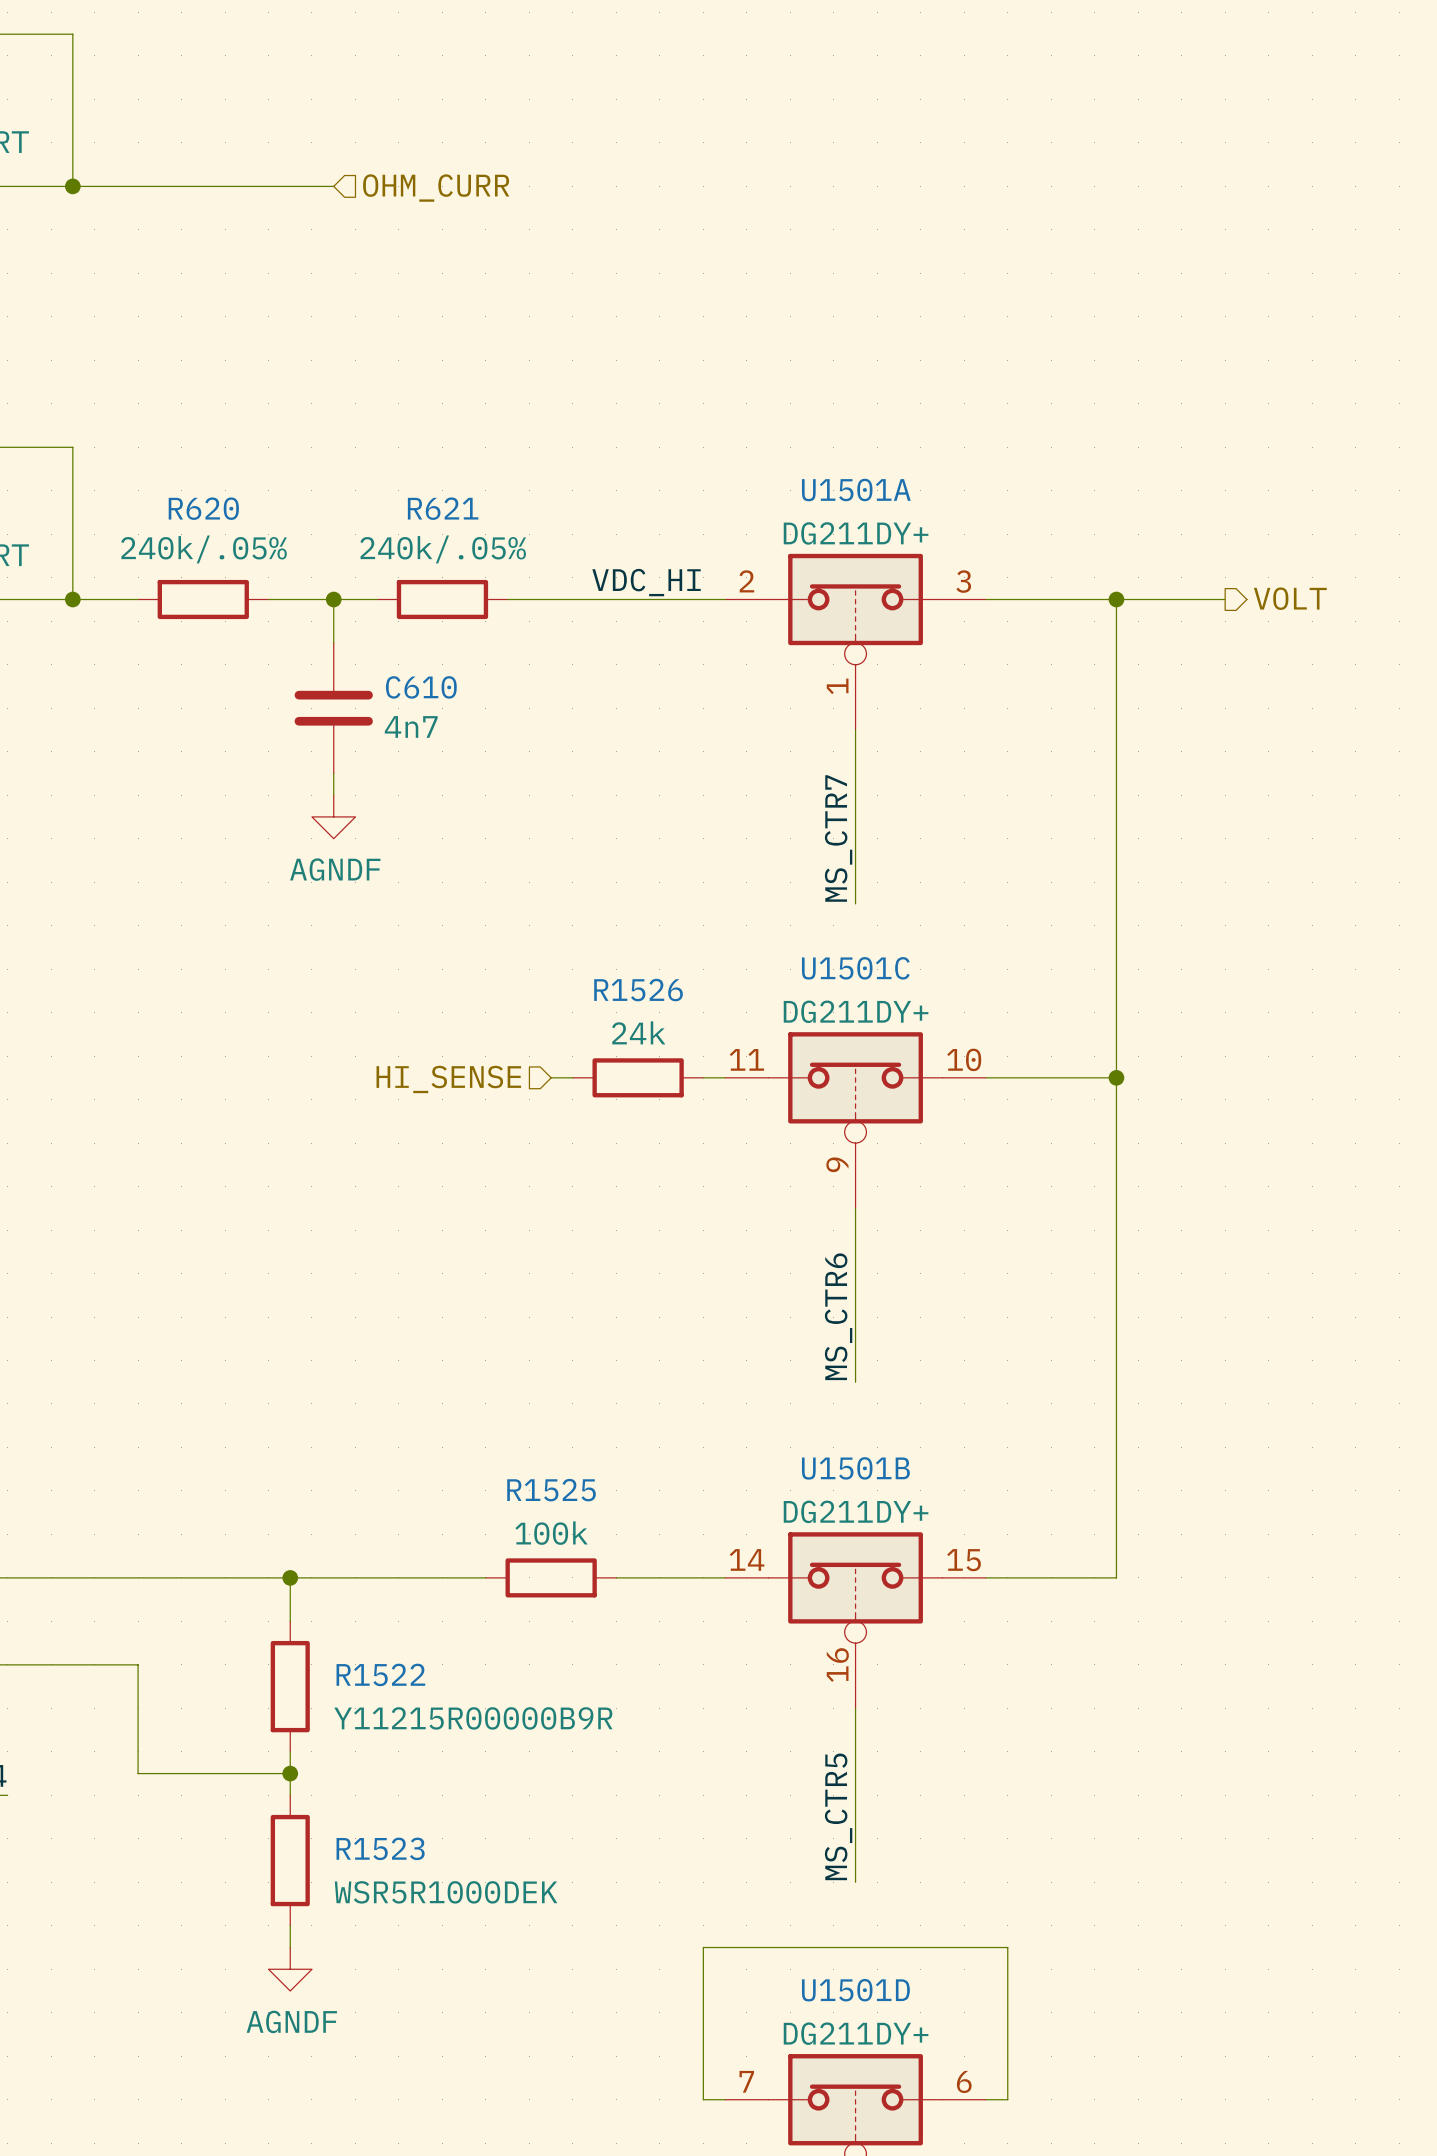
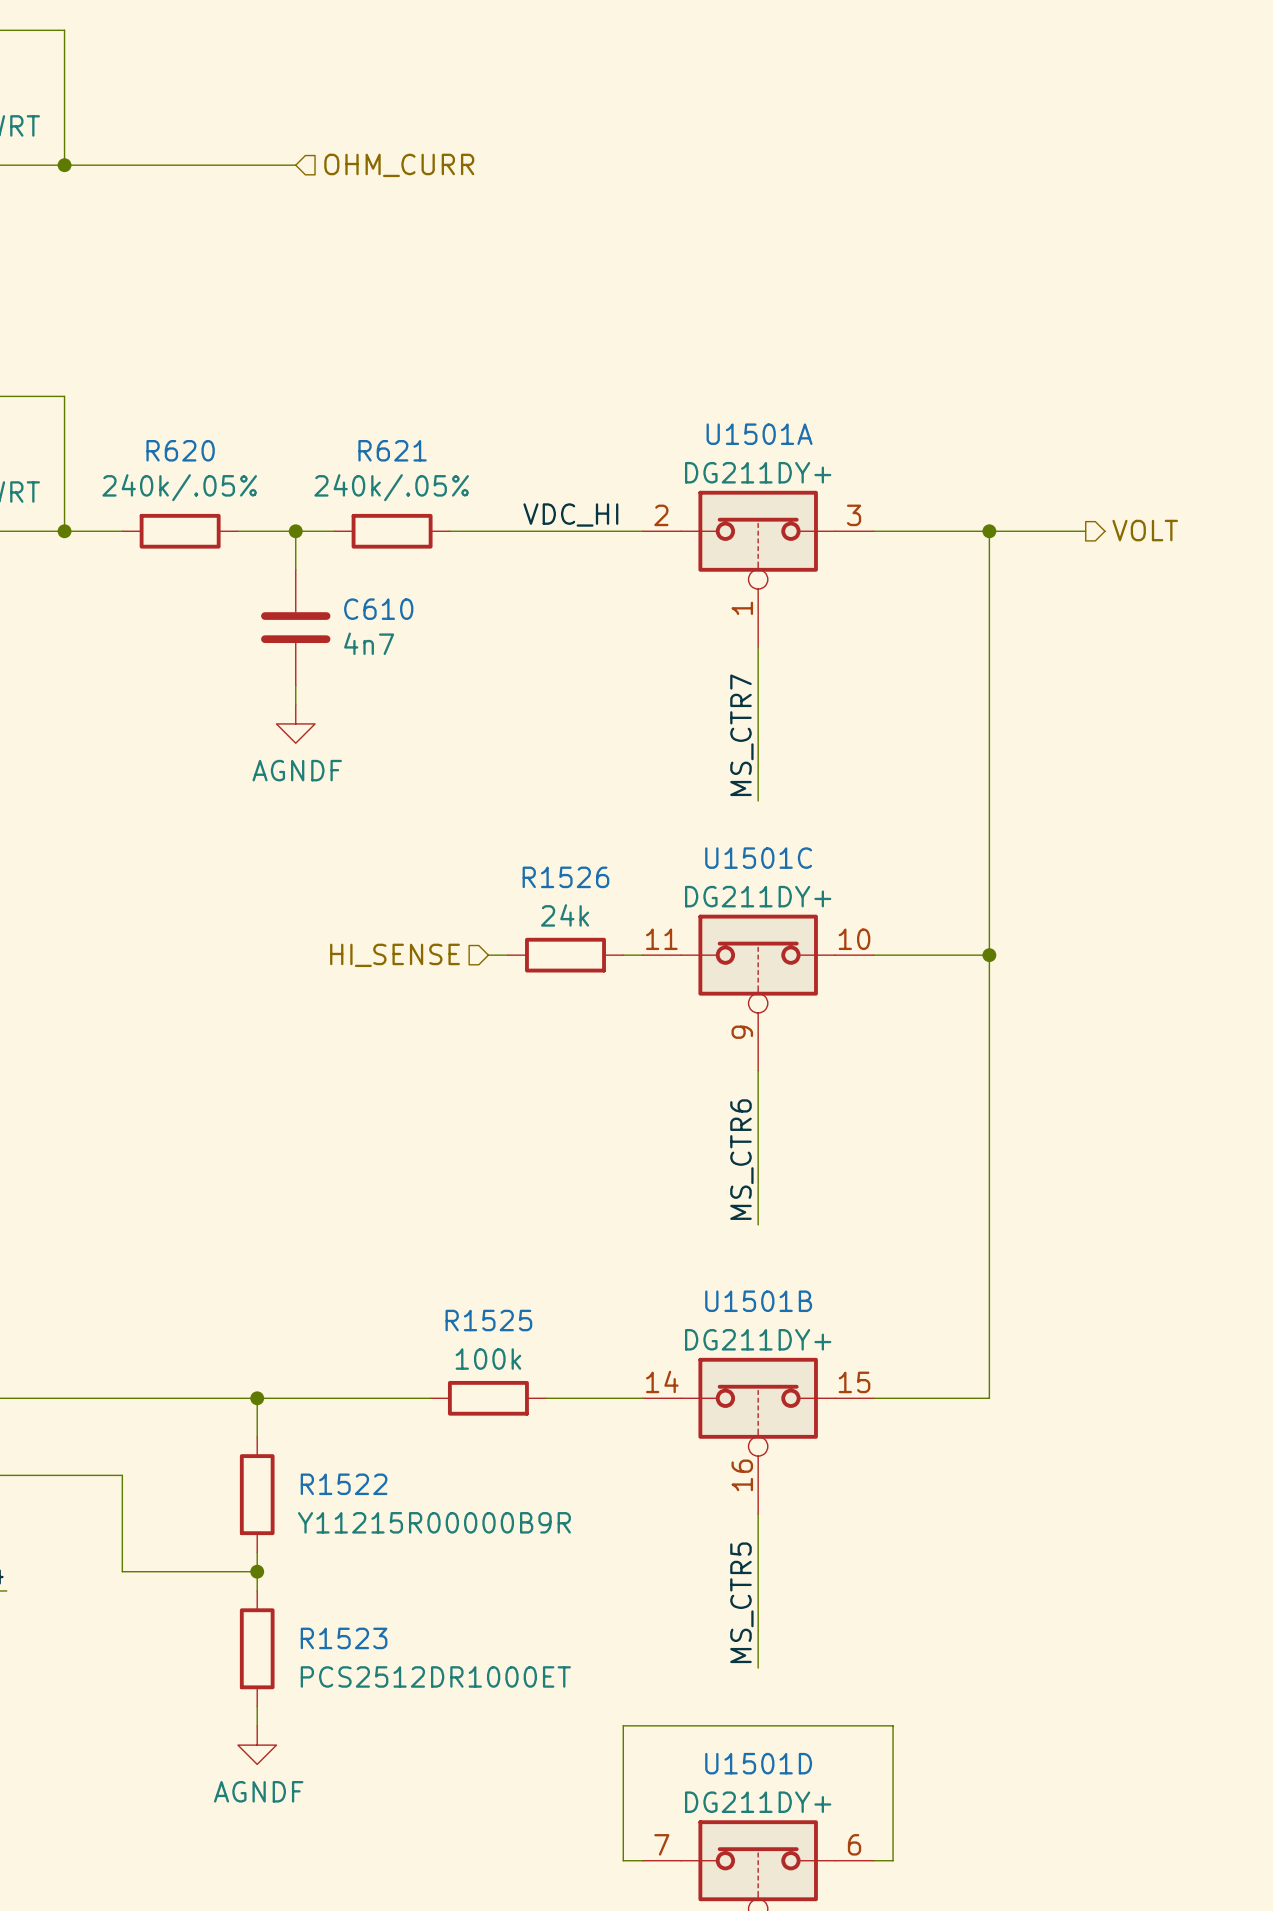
R1523 value: WSR5R1000DEK (446, 1892) -> PCS2512DR1000ET (435, 1676)

